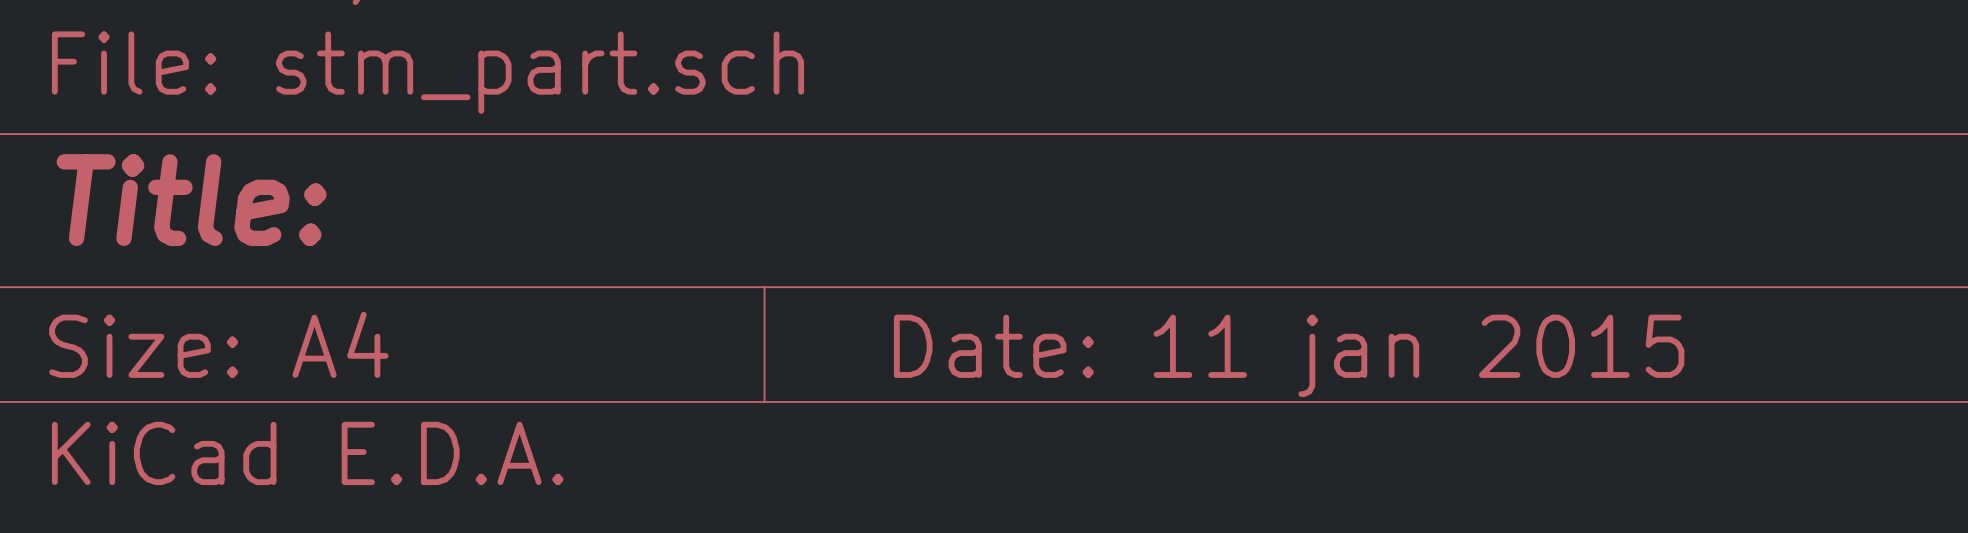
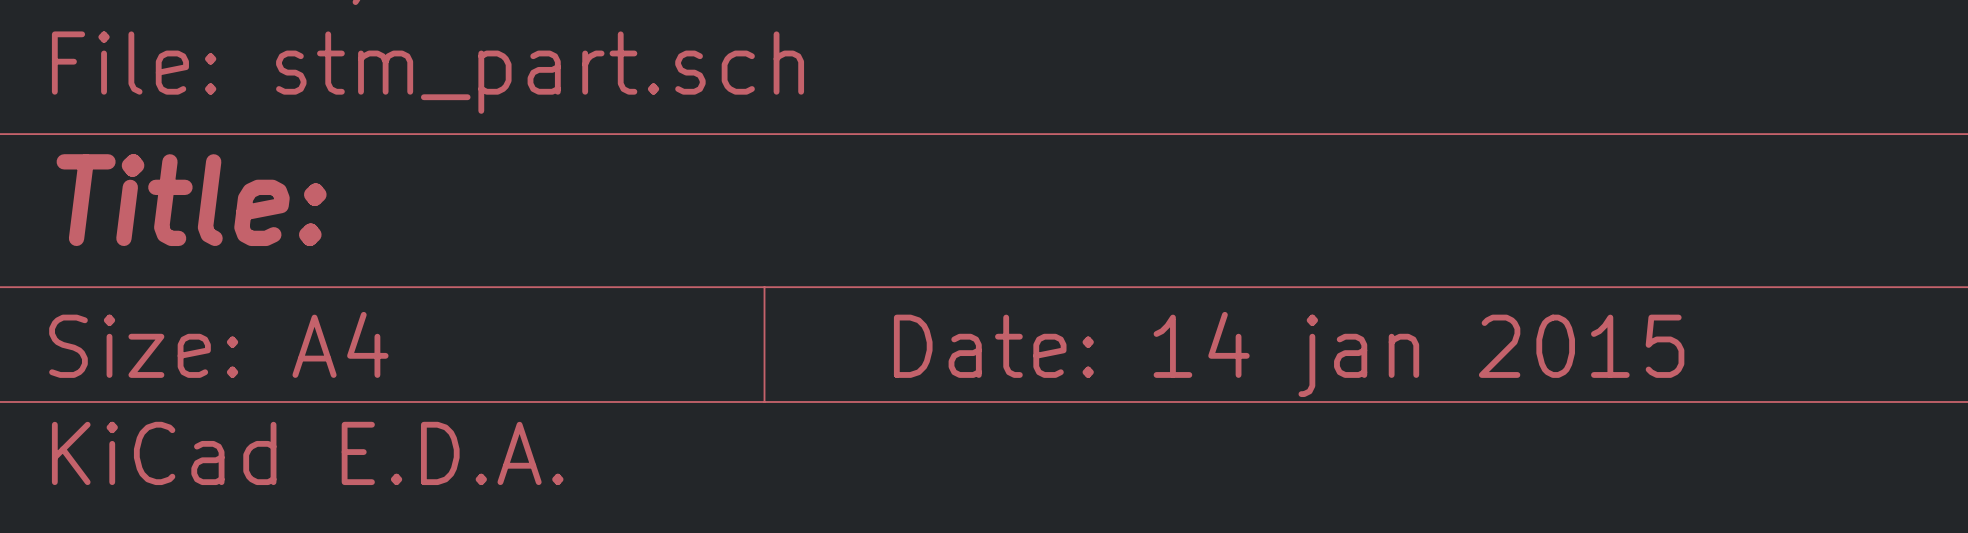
title block: Date: 11 jan 2015 (1289, 355) -> Date: 14 jan 2015 (1289, 354)

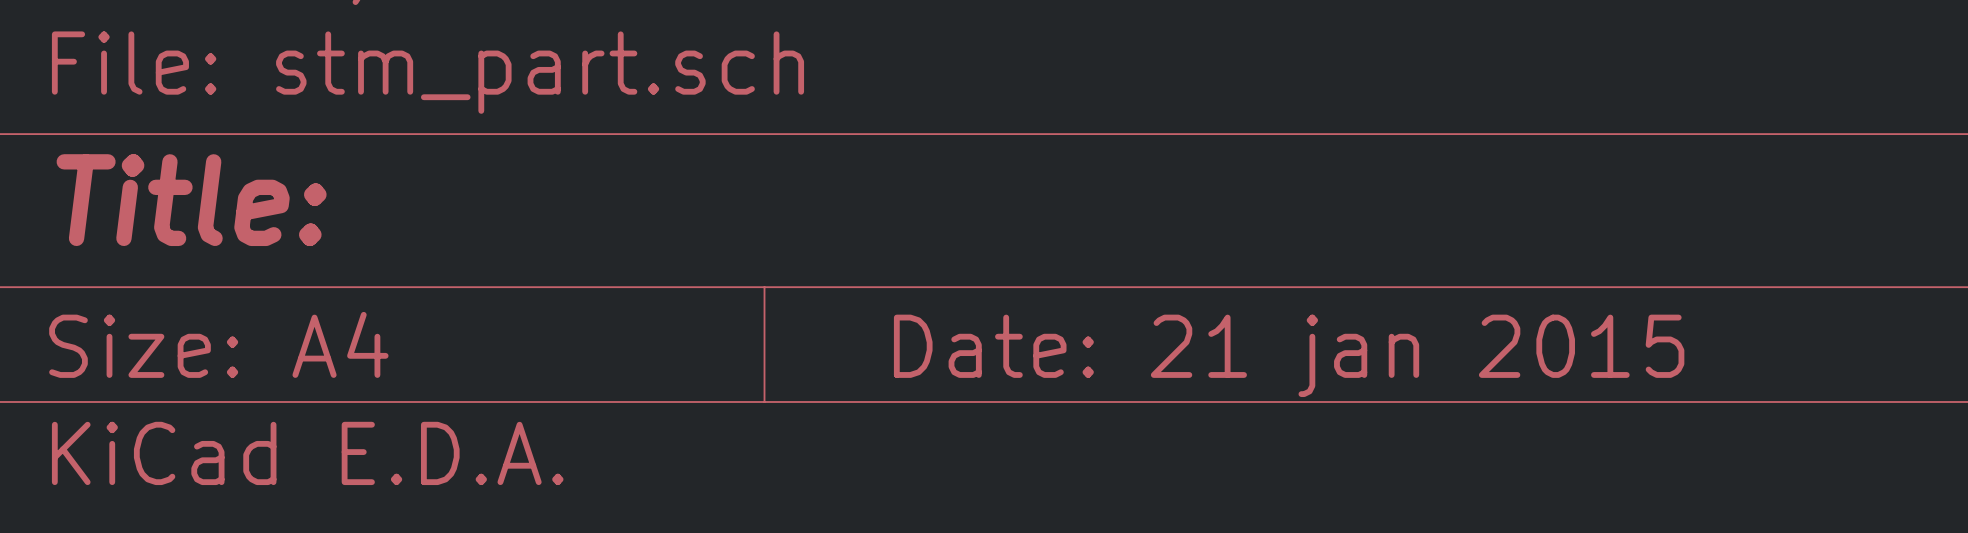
title block: Date: 14 jan 2015 (1289, 354) -> Date: 21 jan 2015 (1289, 355)

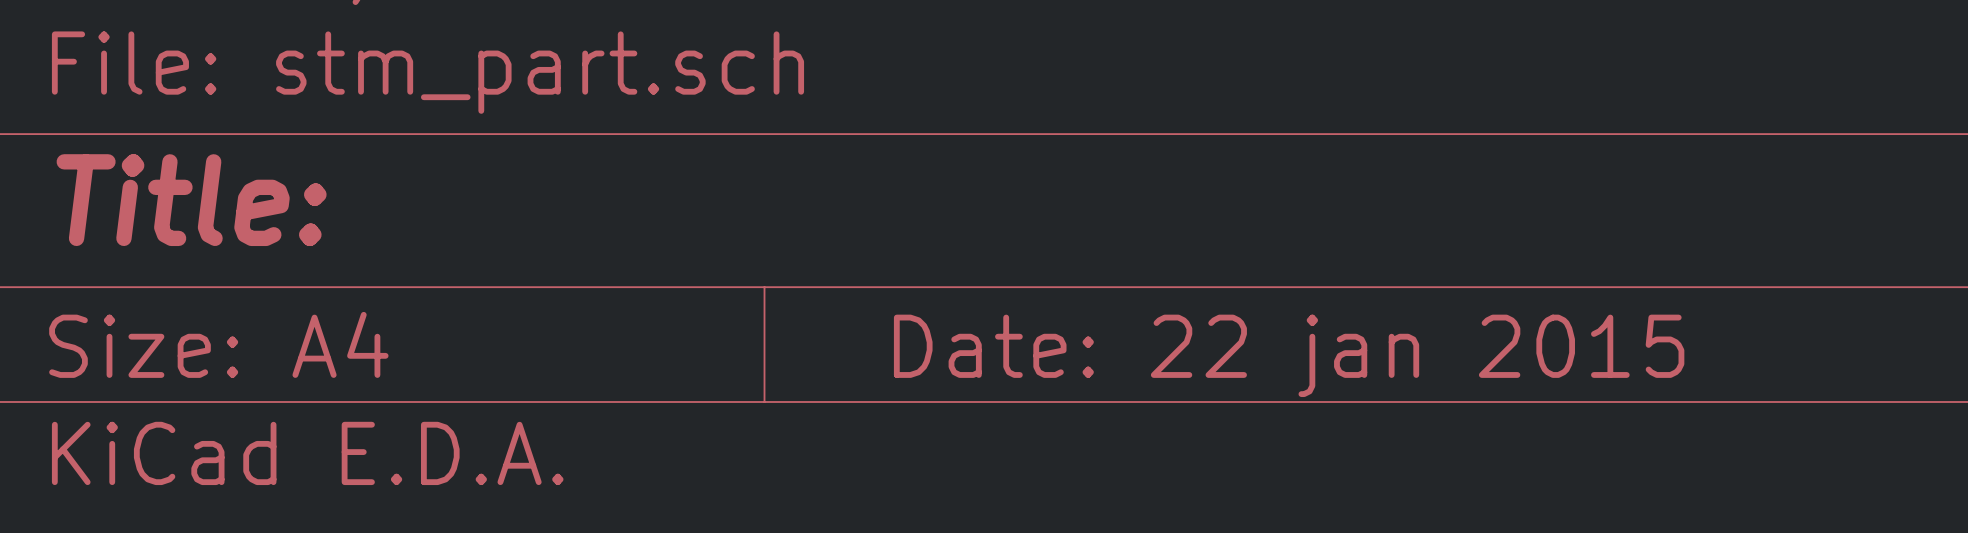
title block: Date: 21 jan 2015 (1289, 355) -> Date: 22 jan 2015 (1289, 355)

